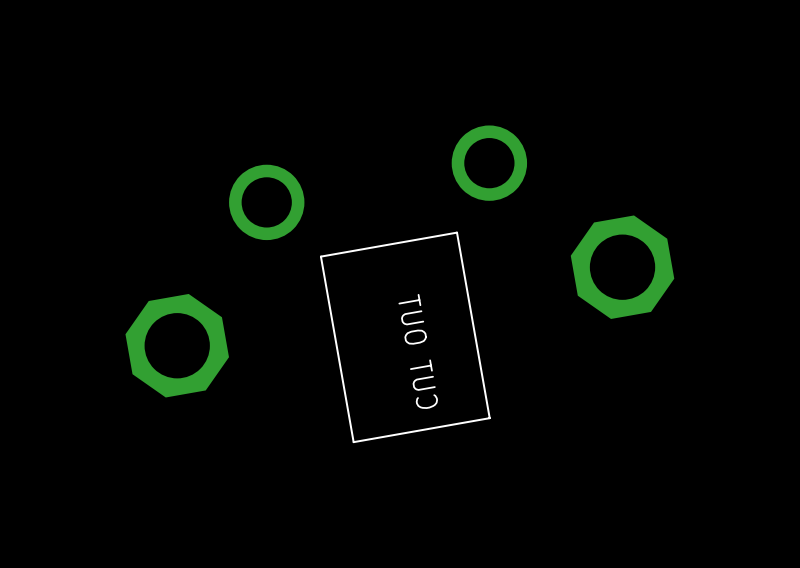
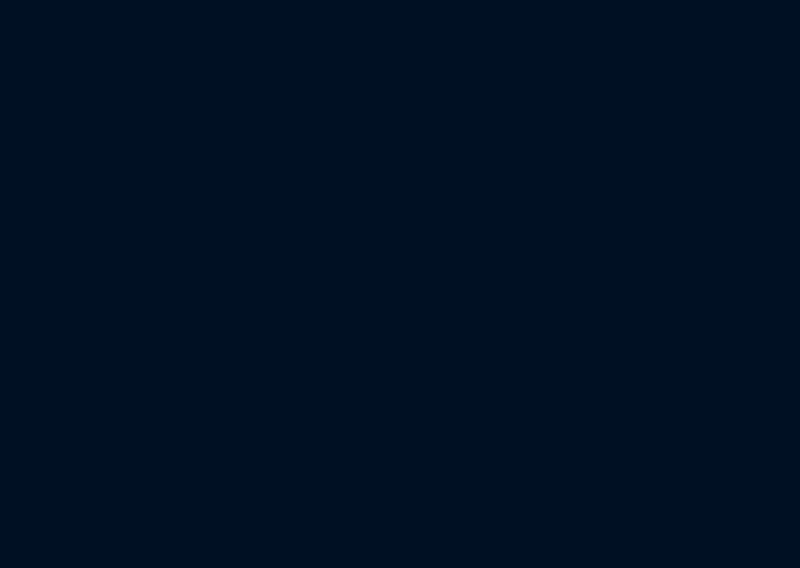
part: (399, 283) -> none

